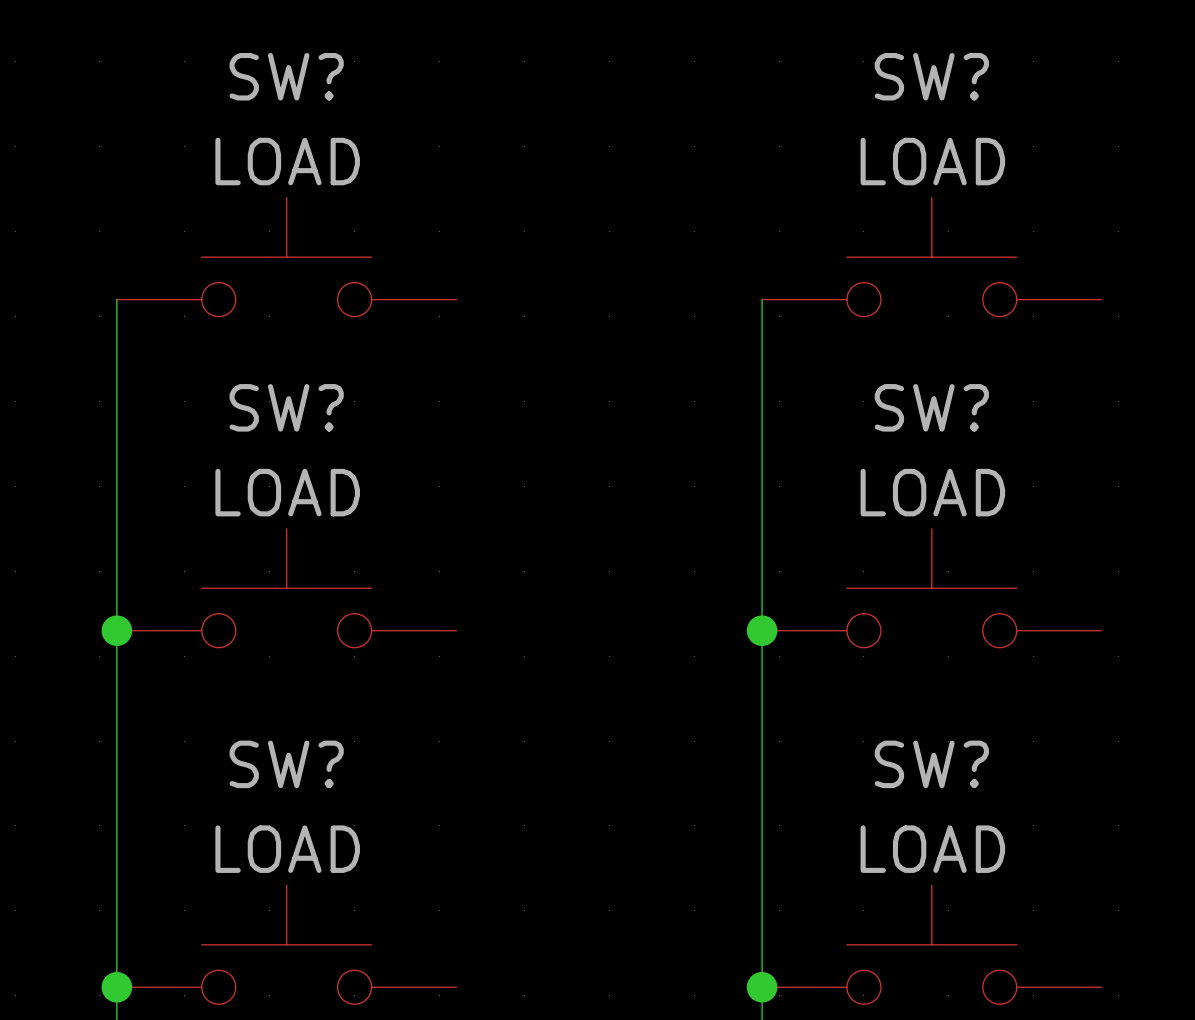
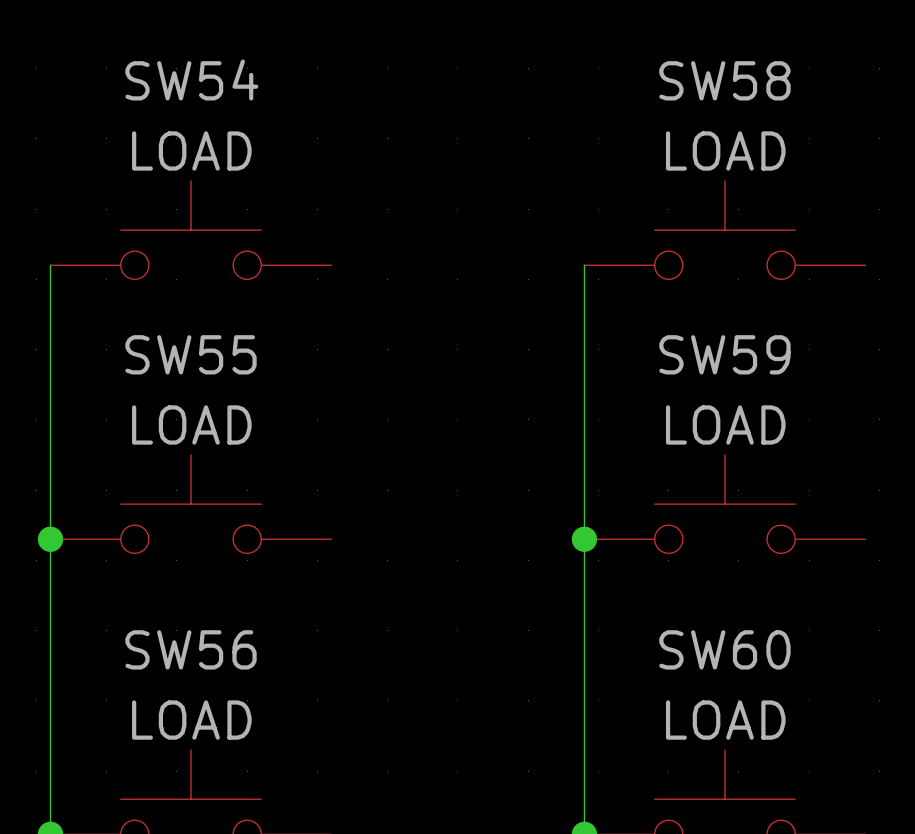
SW? name: SW? (286, 76) -> SW54 (191, 79)
SW? name: SW? (931, 76) -> SW58 (724, 80)
SW? name: SW? (286, 407) -> SW55 (191, 354)
SW? name: SW? (931, 407) -> SW59 (724, 354)
SW? name: SW? (286, 764) -> SW56 (191, 649)
SW? name: SW? (931, 764) -> SW60 (724, 649)

